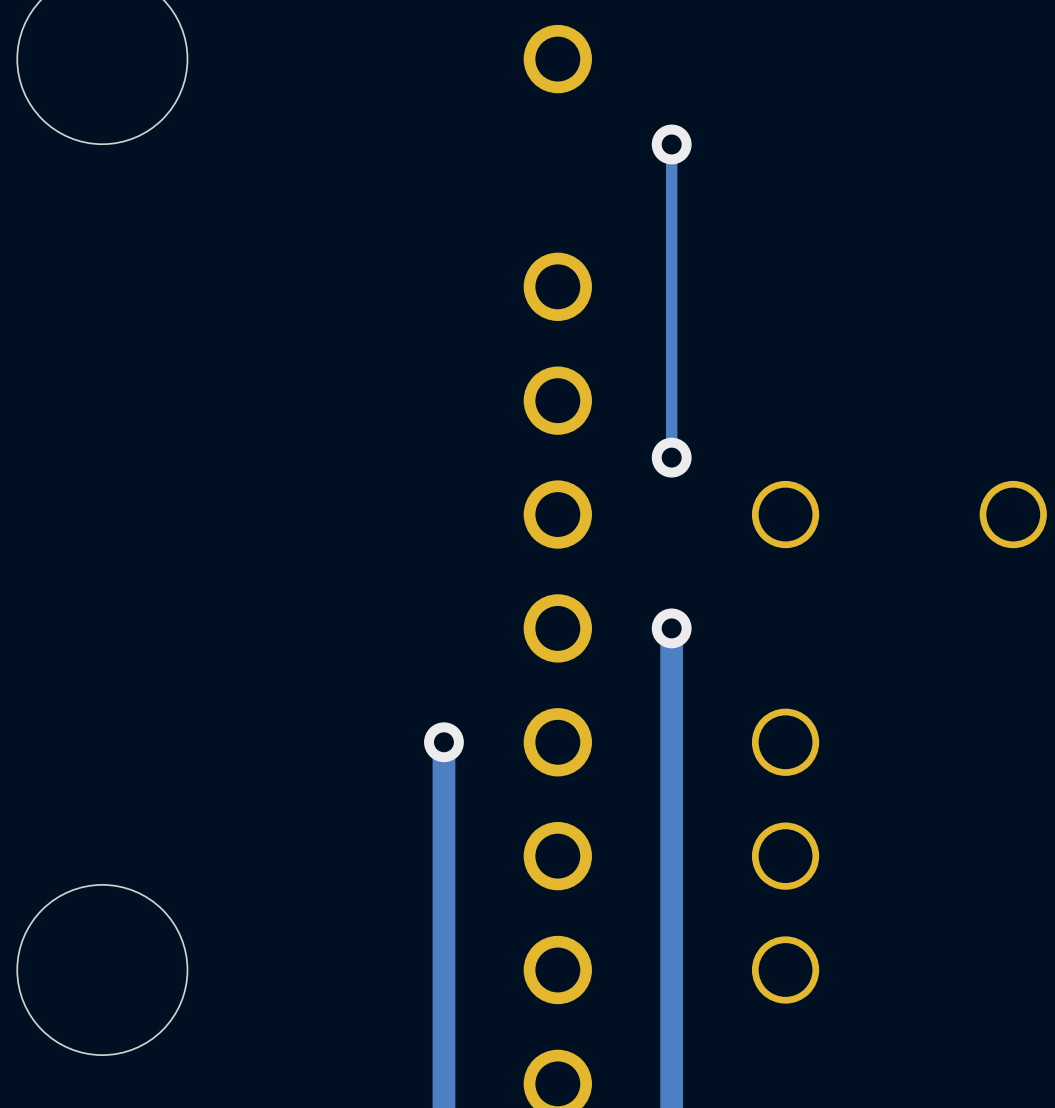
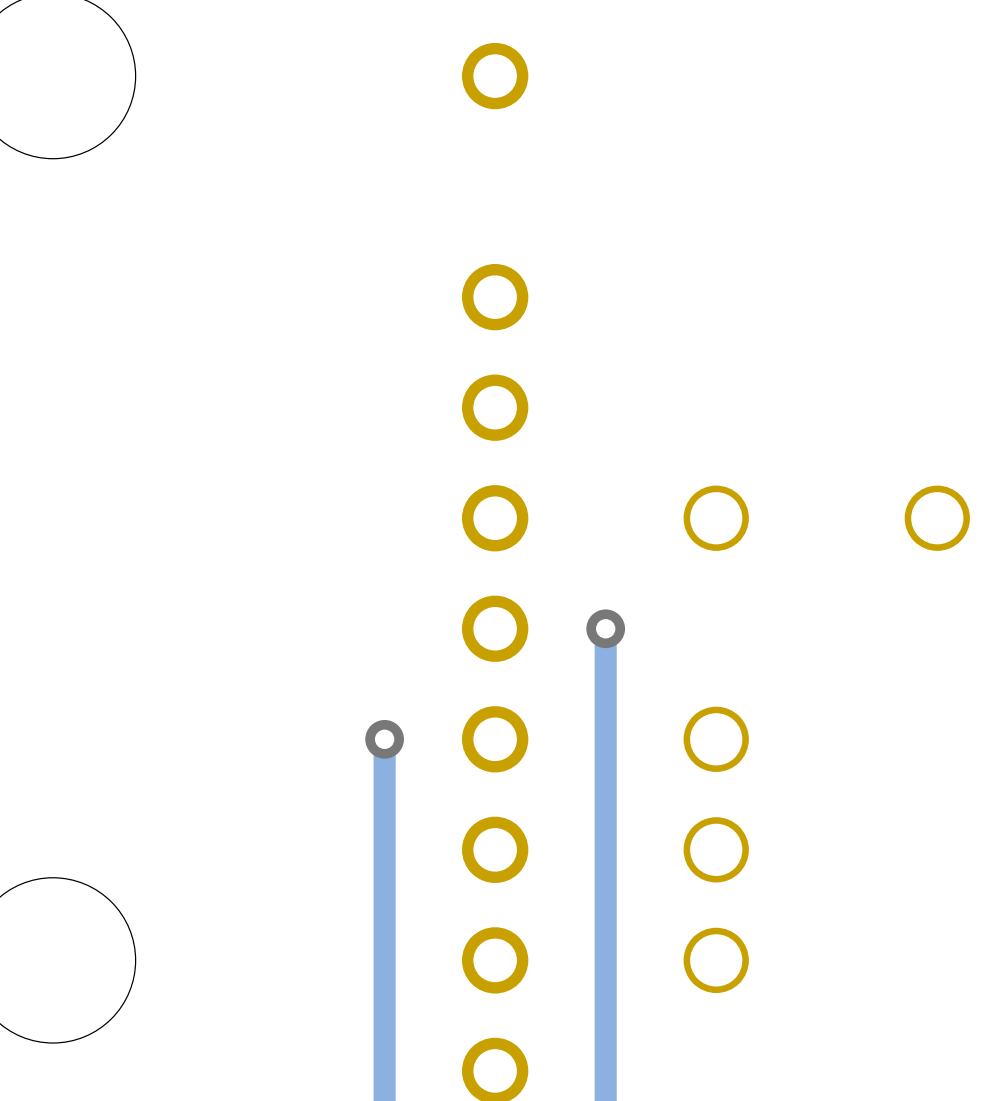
track: (671, 144) (671, 457) -> none
via: (671, 144) -> none
via: (671, 457) -> none

